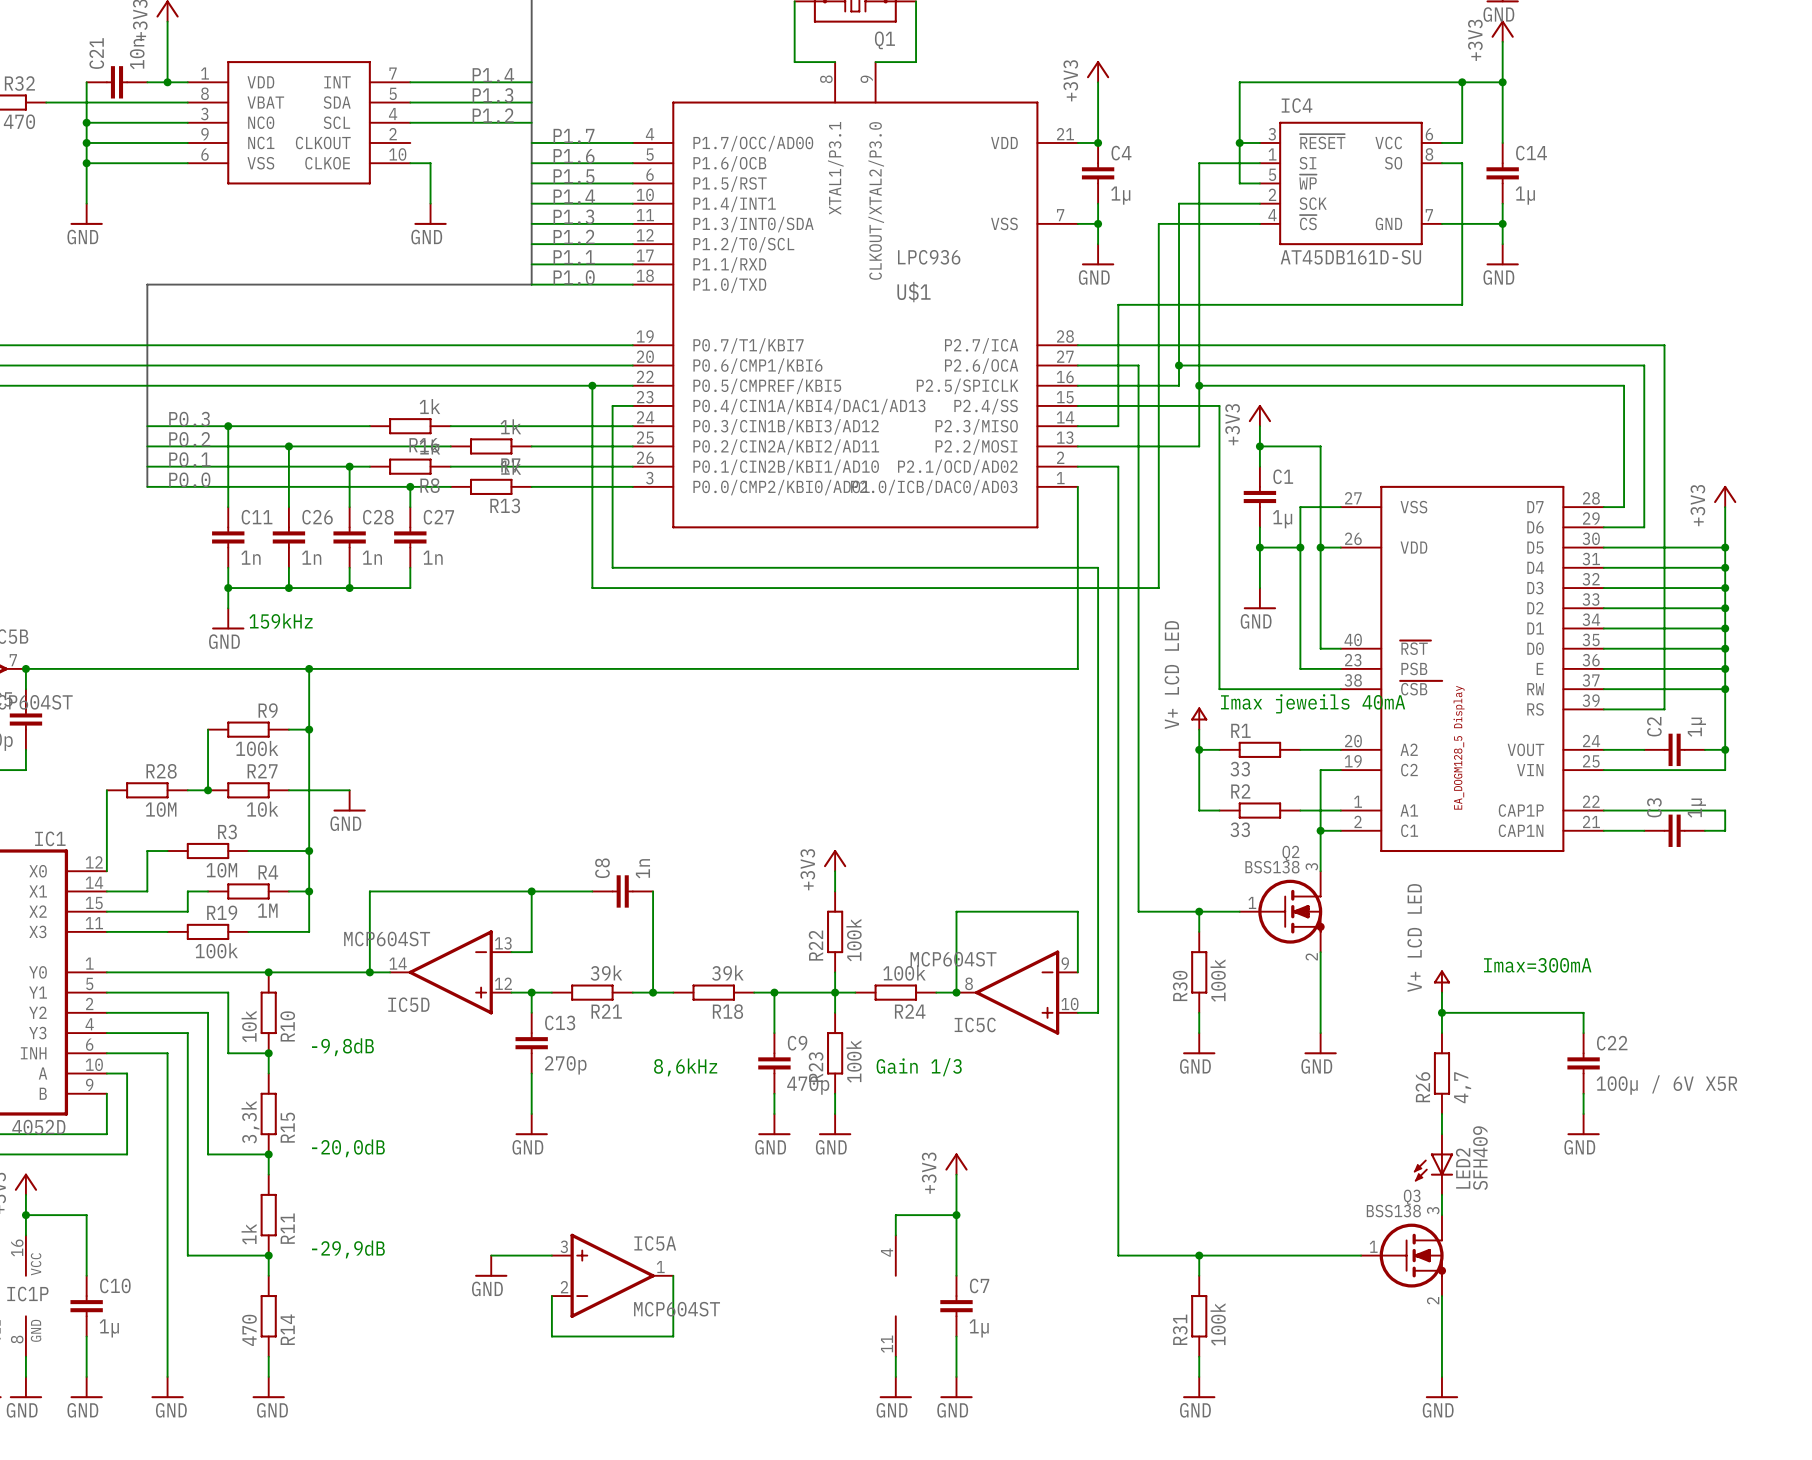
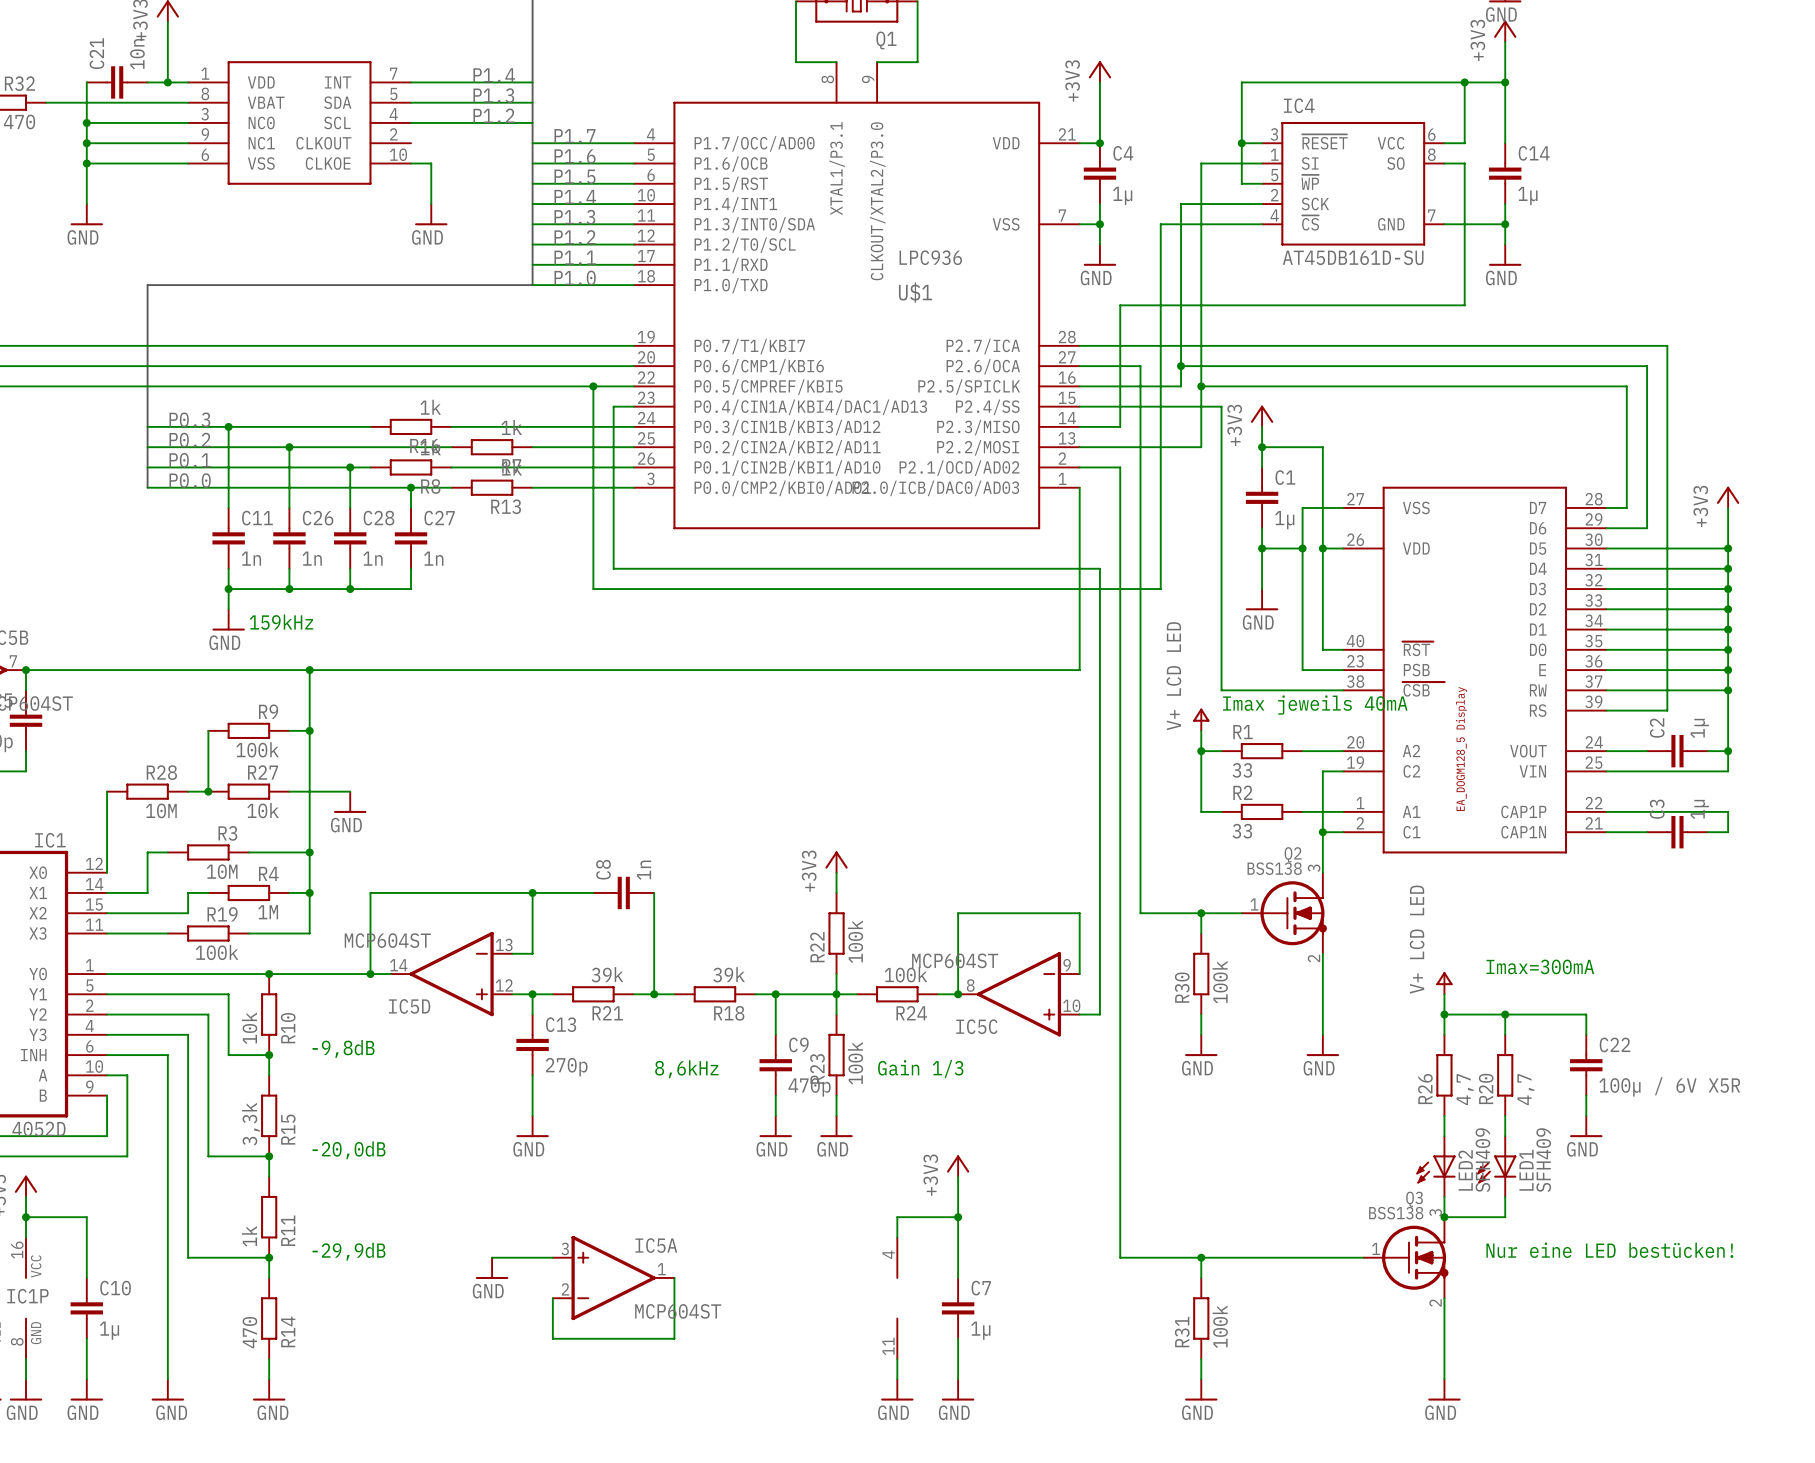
wire: none -> (1505, 1014) (1505, 1034)
junction: none -> (1505, 1014)
R20: none -> 4,7 (1505, 1075)
wire: none -> (1505, 1115) (1505, 1136)
LED1: none -> SFH409 (1496, 1166)
wire: none -> (1505, 1196) (1505, 1217) (1444, 1217)
junction: none -> (1444, 1217)
text: none -> Nur eine LED bestücken! (1609, 1250)

